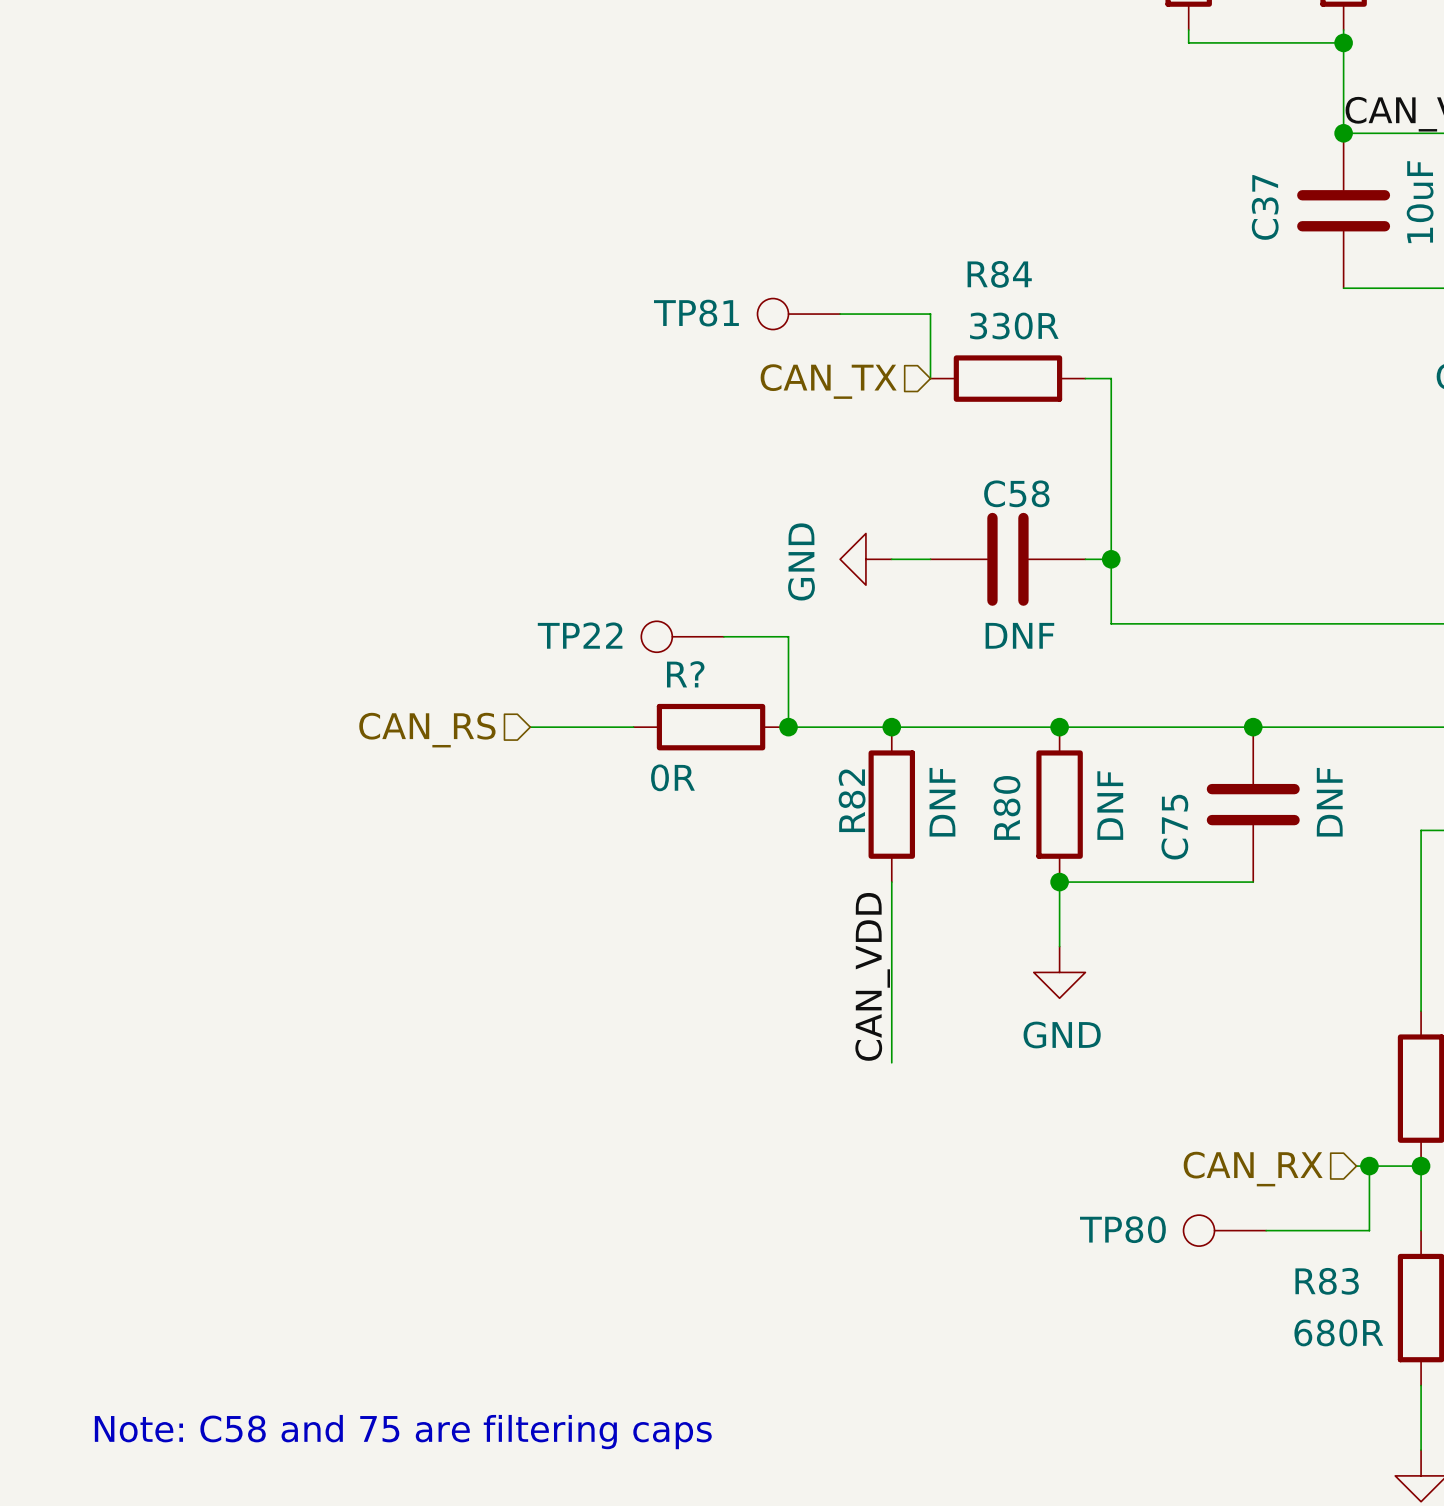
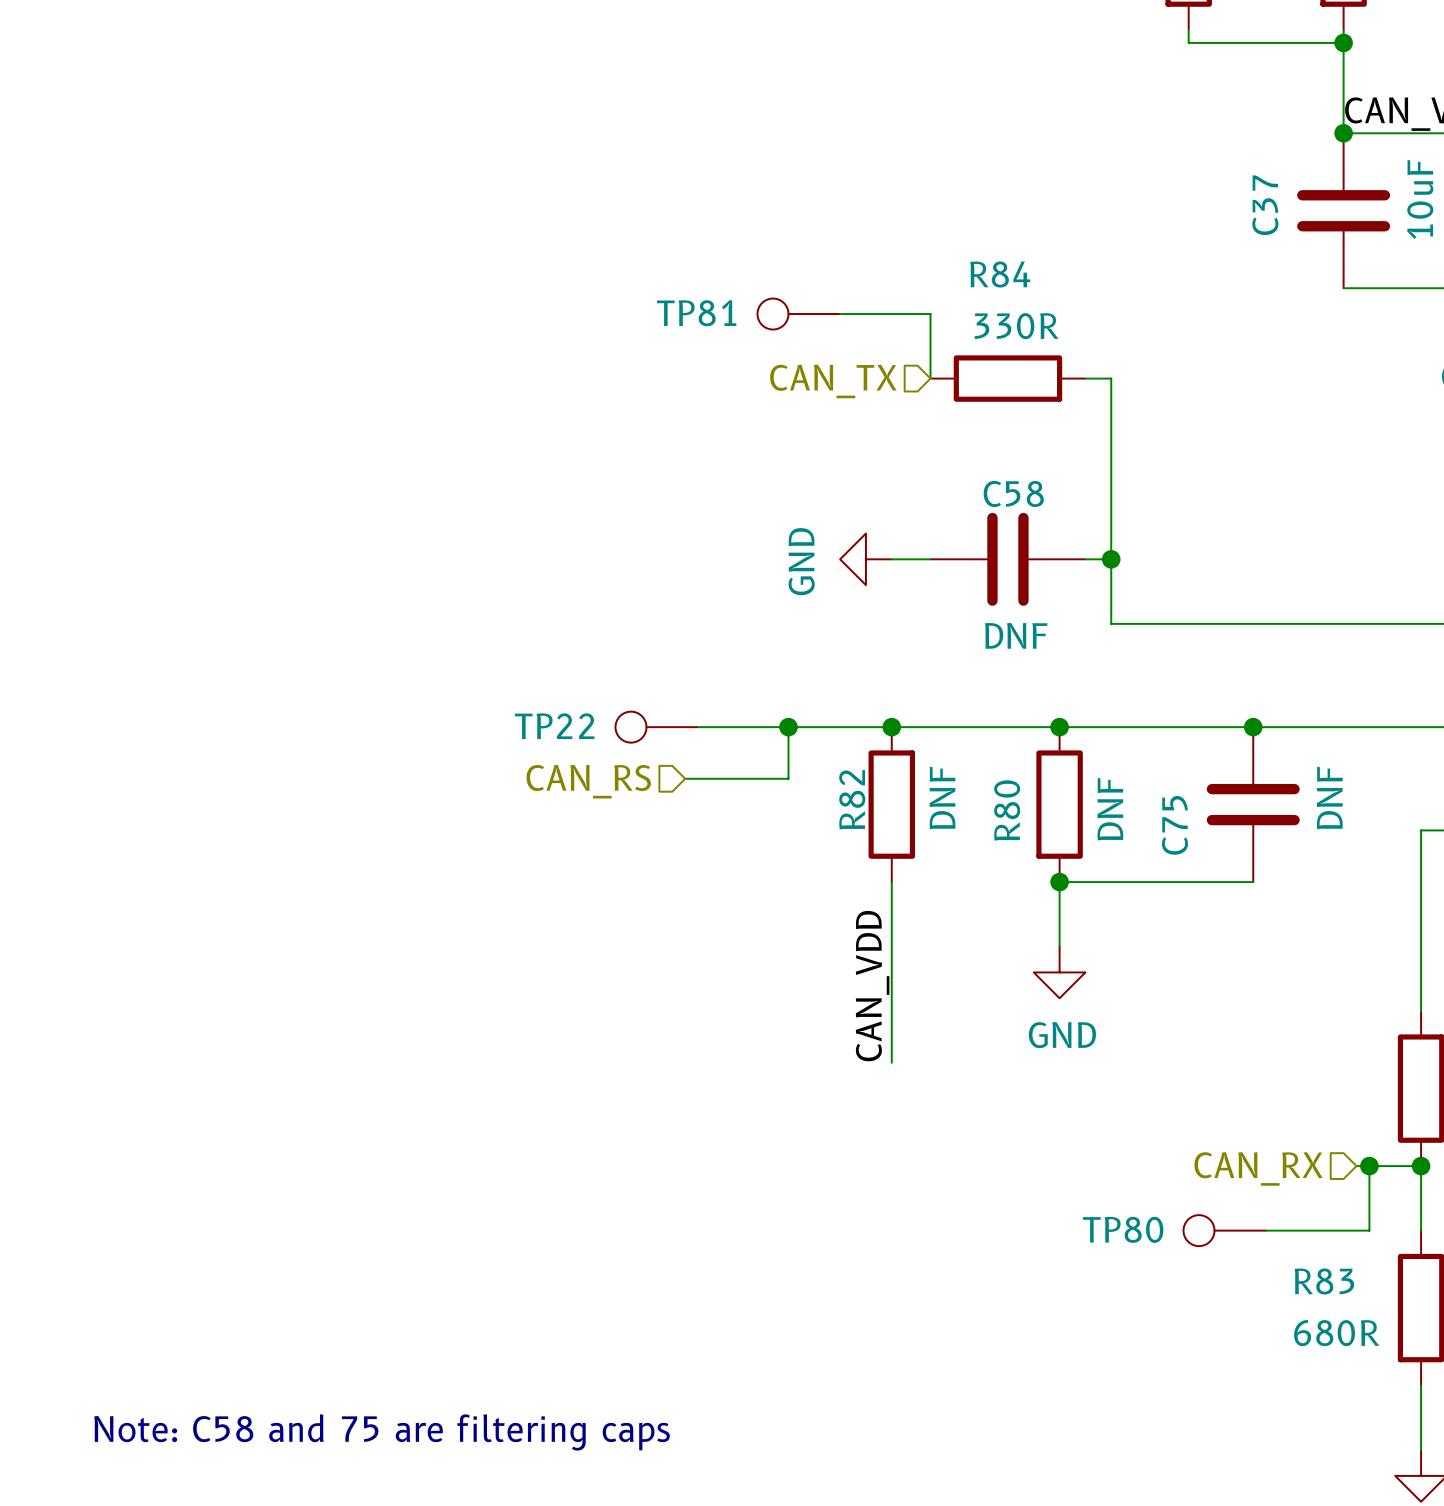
TP22 position: (682, 636) -> (656, 727)
wire: (723, 636) (788, 636) (788, 727) -> none
wire: (530, 727) (633, 727) -> none
wire: none -> (698, 727) (788, 727) (788, 778) (685, 778)
R?: 0R (711, 727) -> none
hierarchical label position: CAN_RS (427, 730) -> CAN_RS (588, 781)

